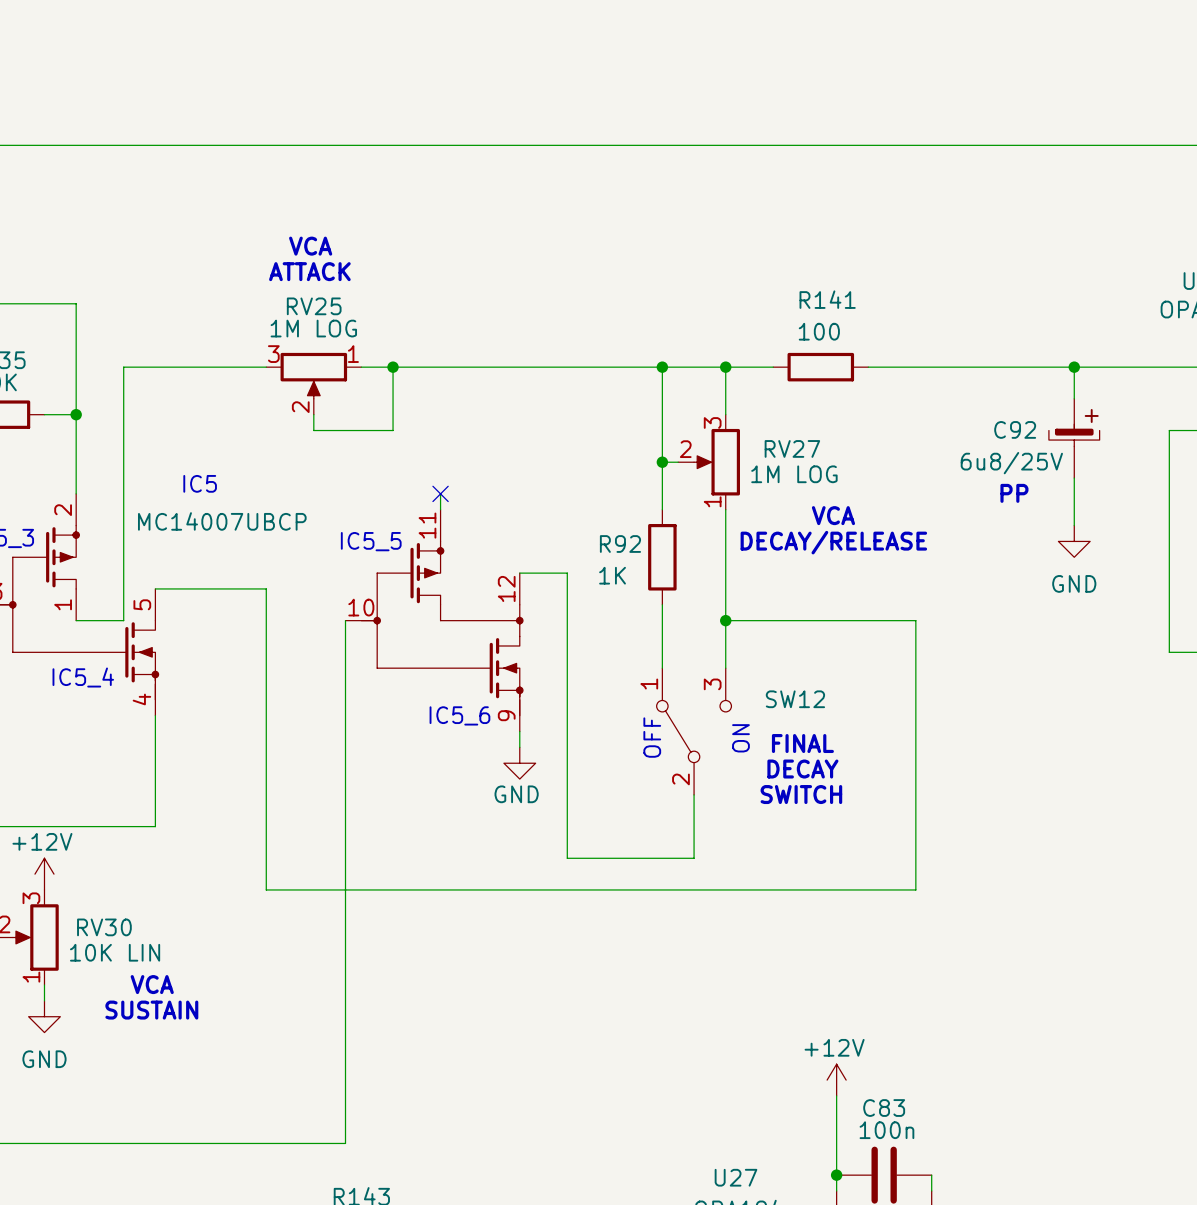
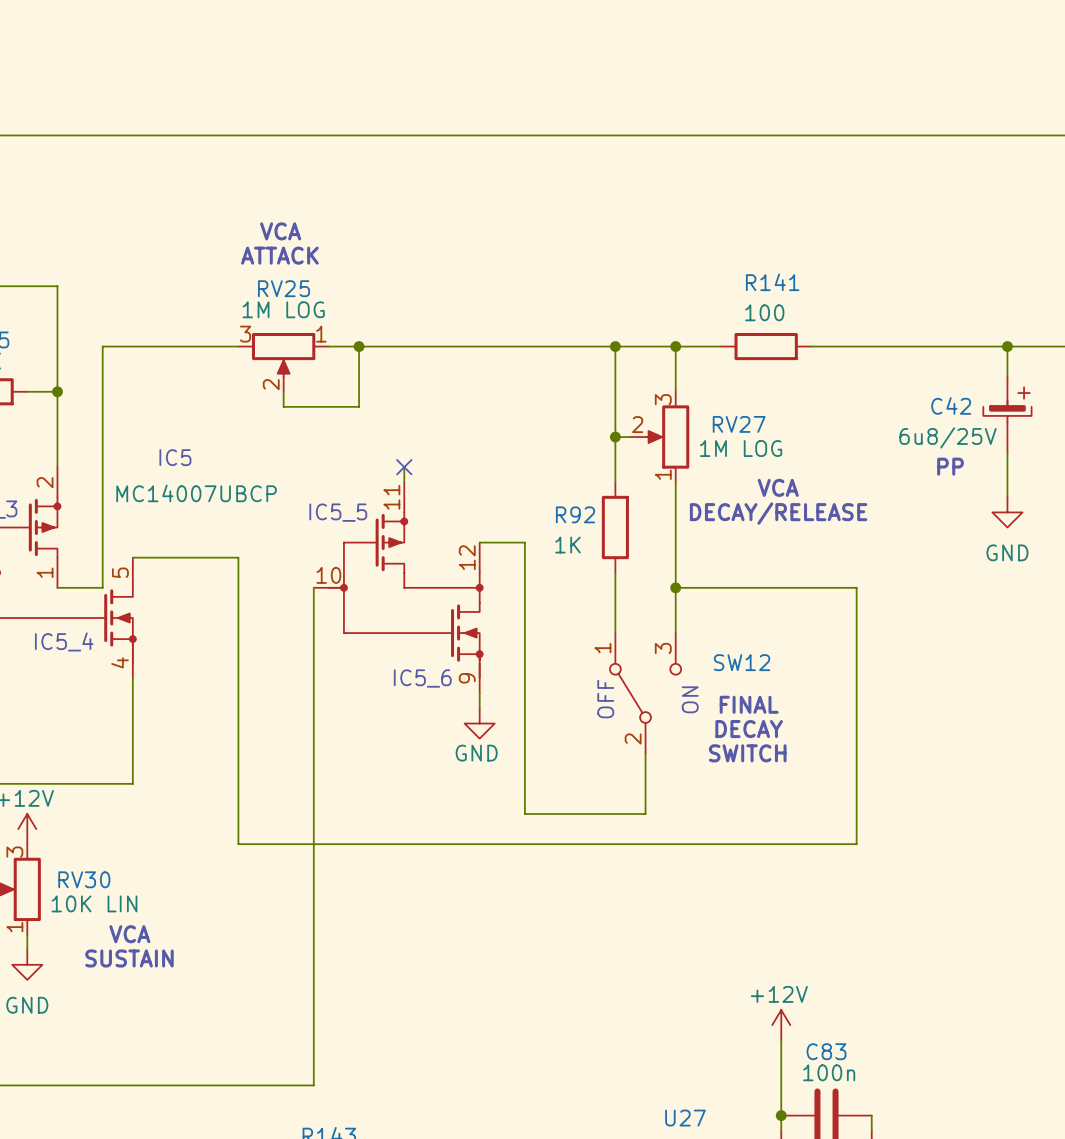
C92 name: C92 (1015, 429) -> C42 (951, 405)

